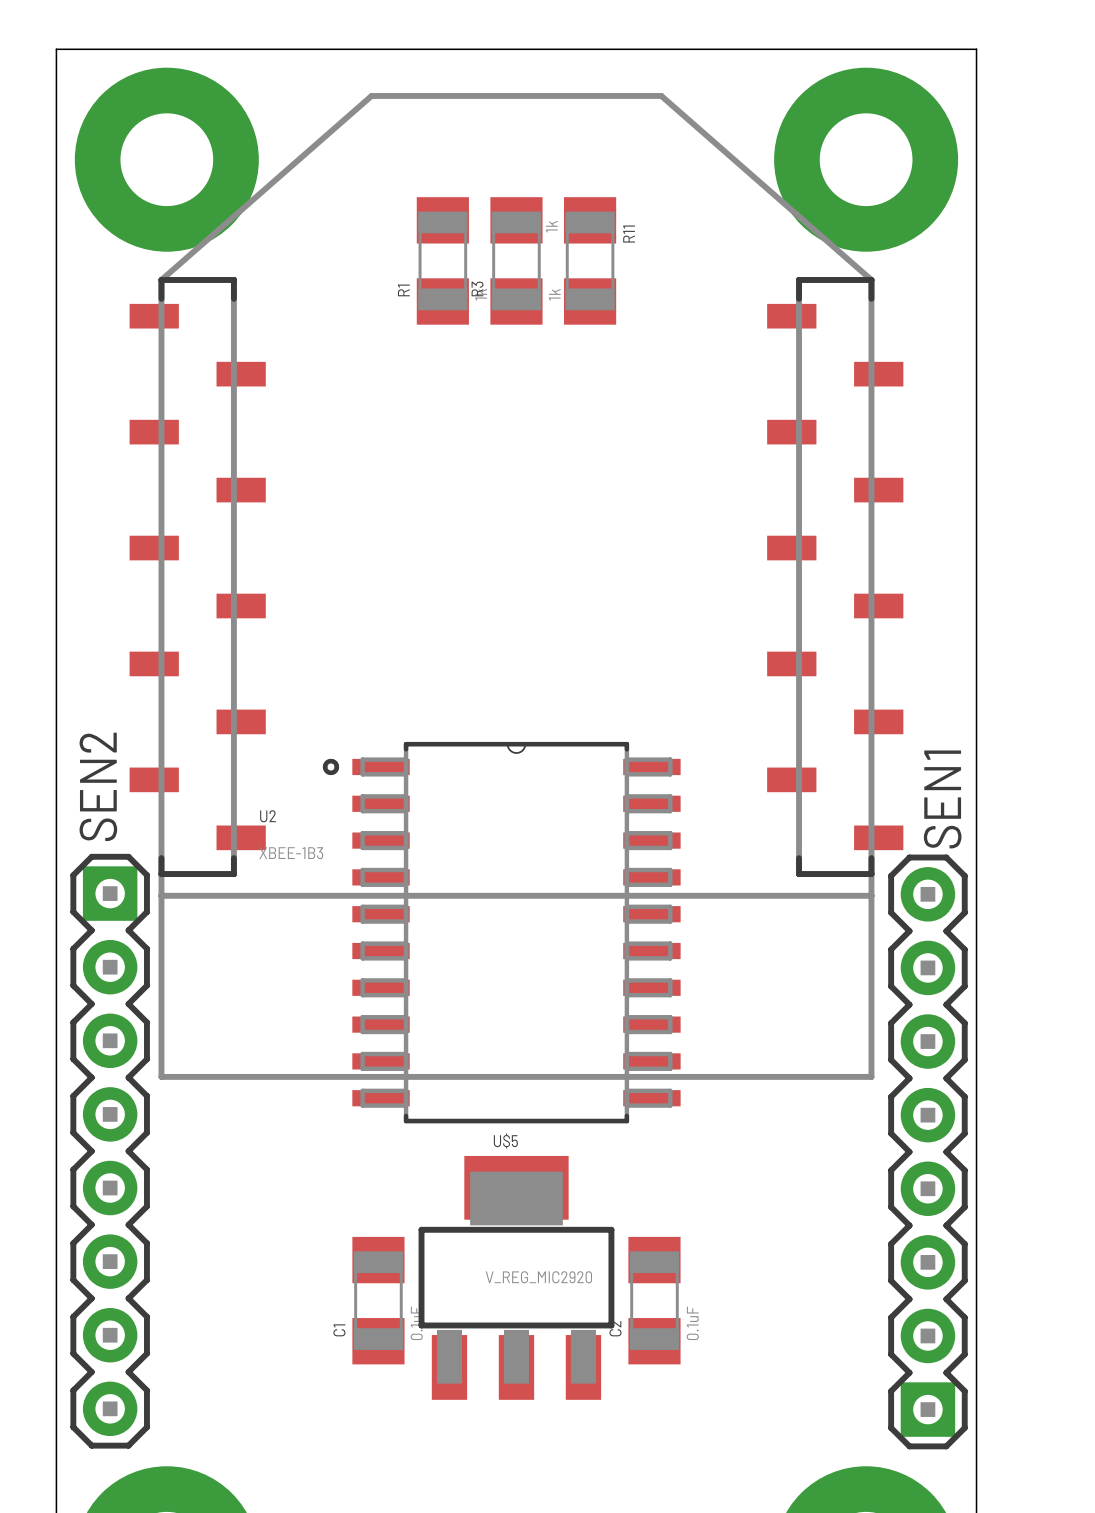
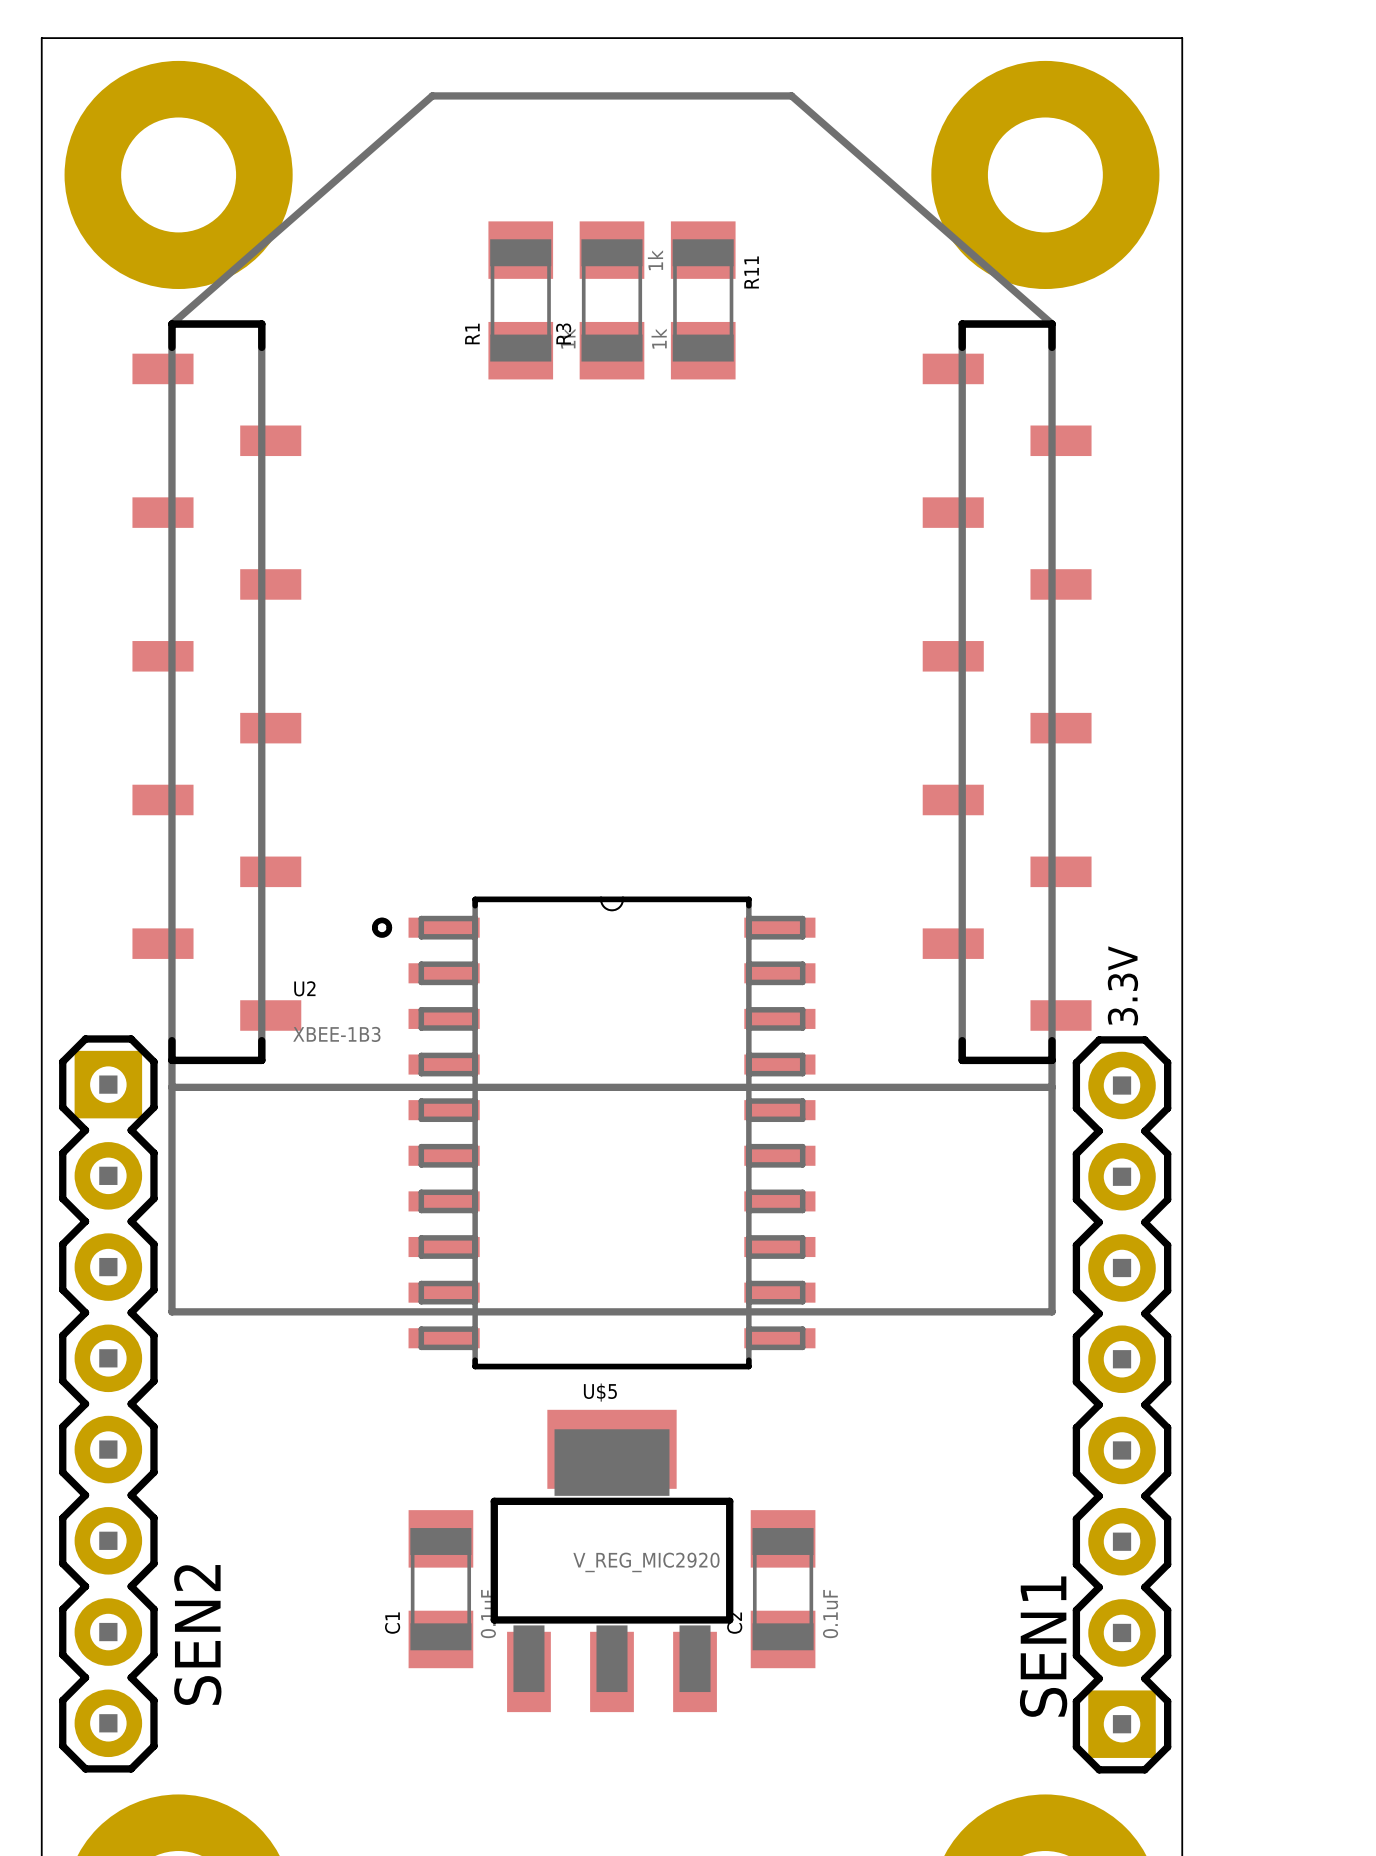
SEN2 name position: SEN2 (98, 786) -> SEN2 (197, 1635)
SEN1 name position: SEN1 (942, 799) -> SEN1 (1043, 1646)
text: none -> 3.3V (1122, 985)

